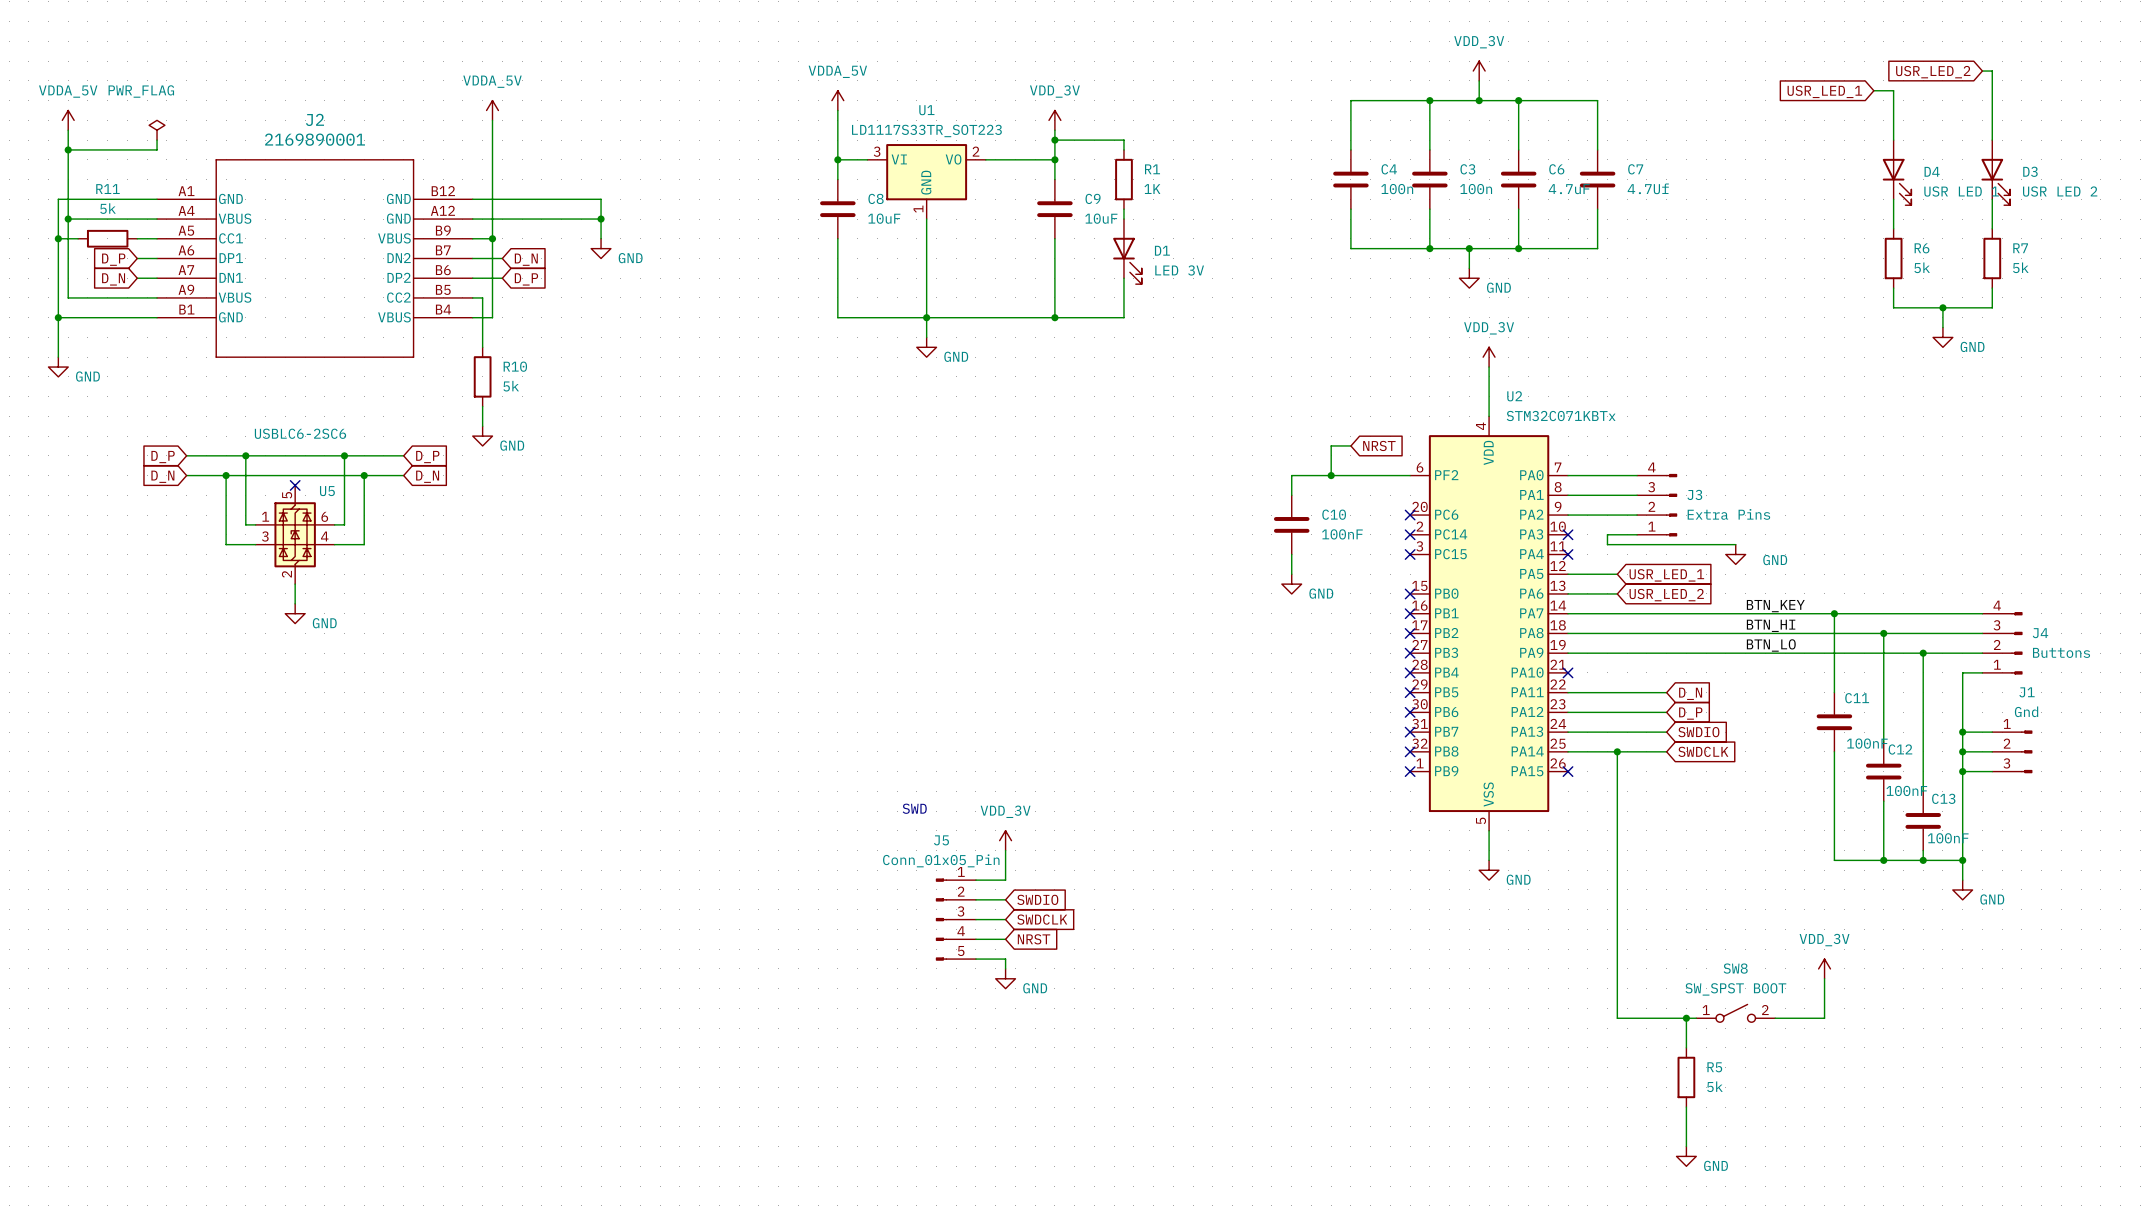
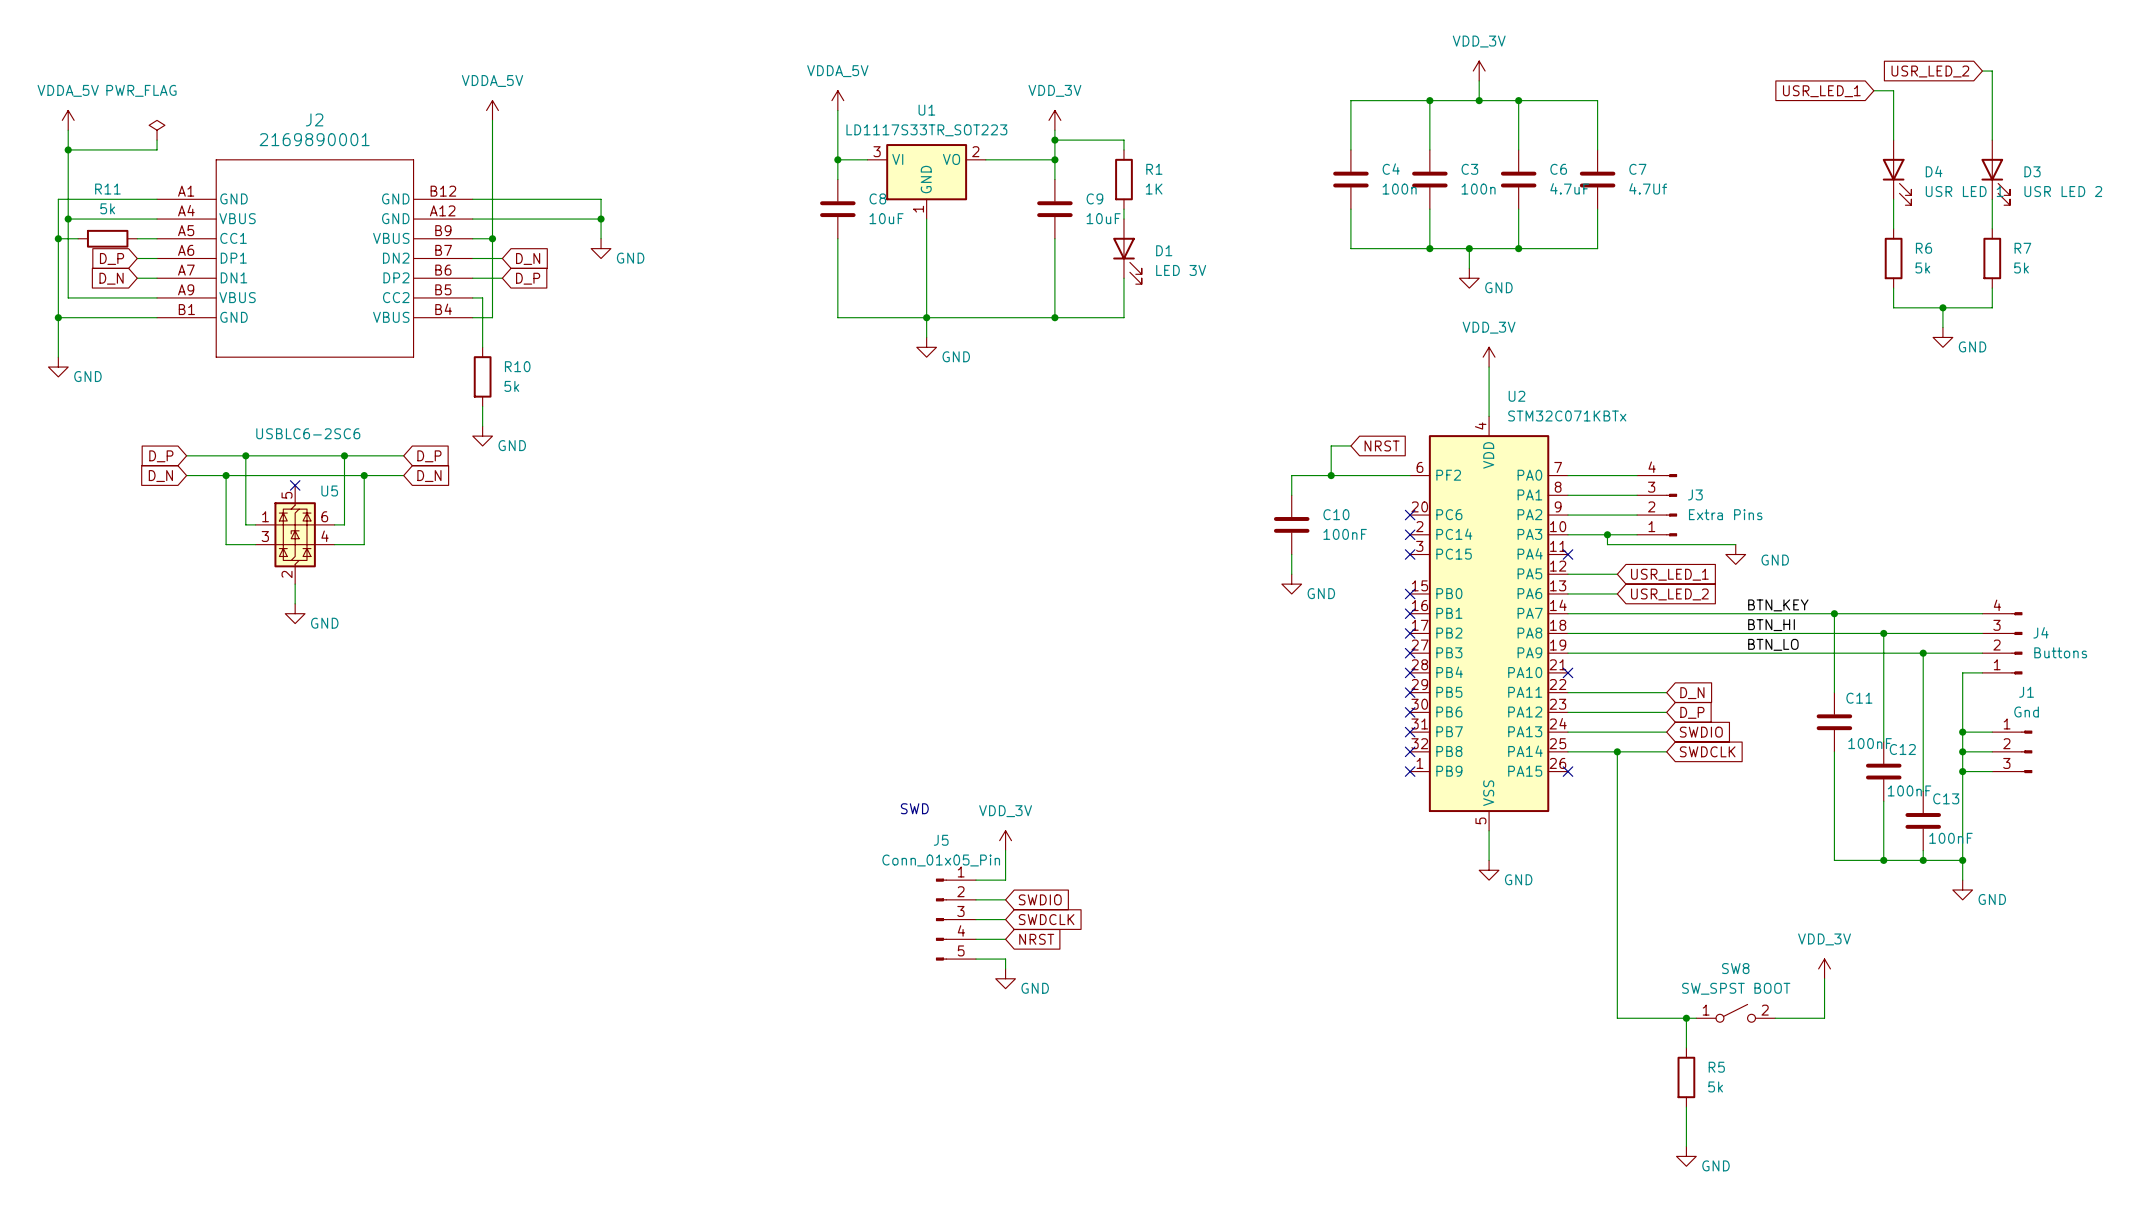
wire: none -> (1568, 534) (1607, 534)
no-connect mark: (1568, 534) -> none
junction: none -> (1607, 534)

